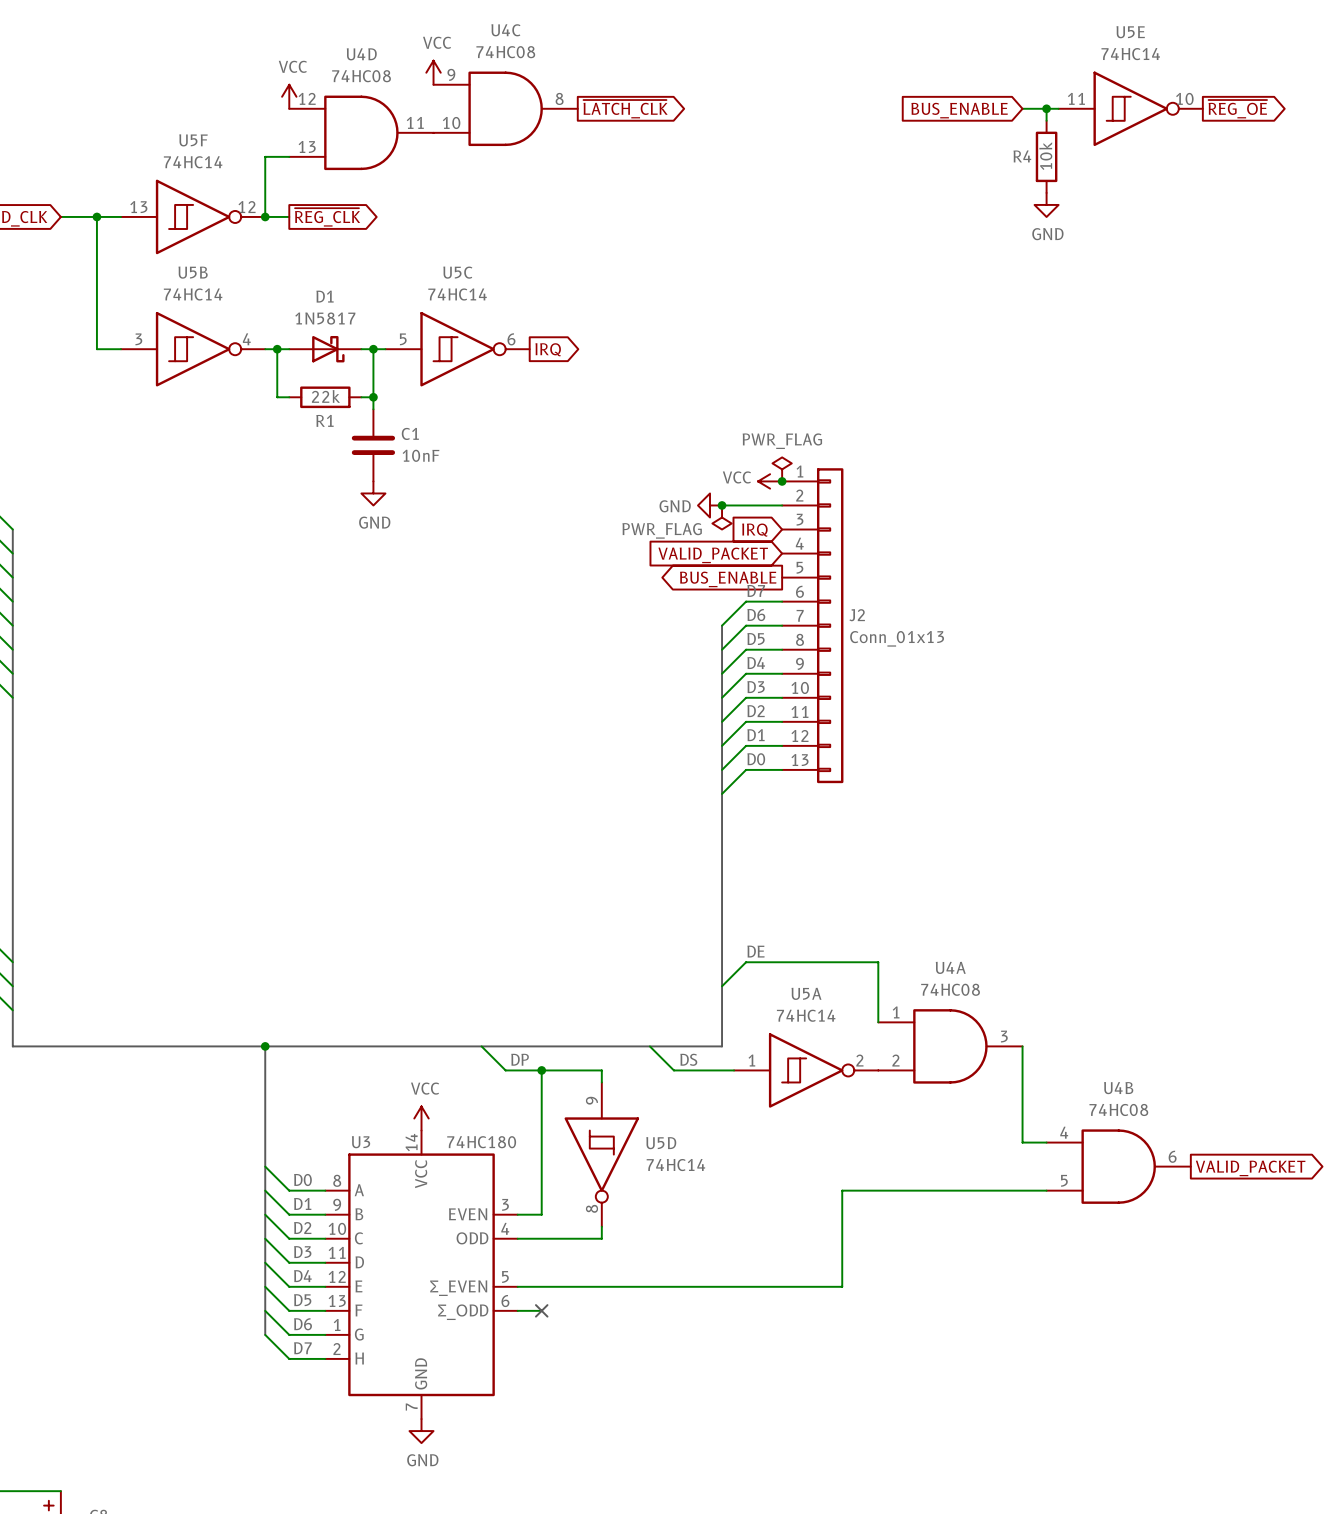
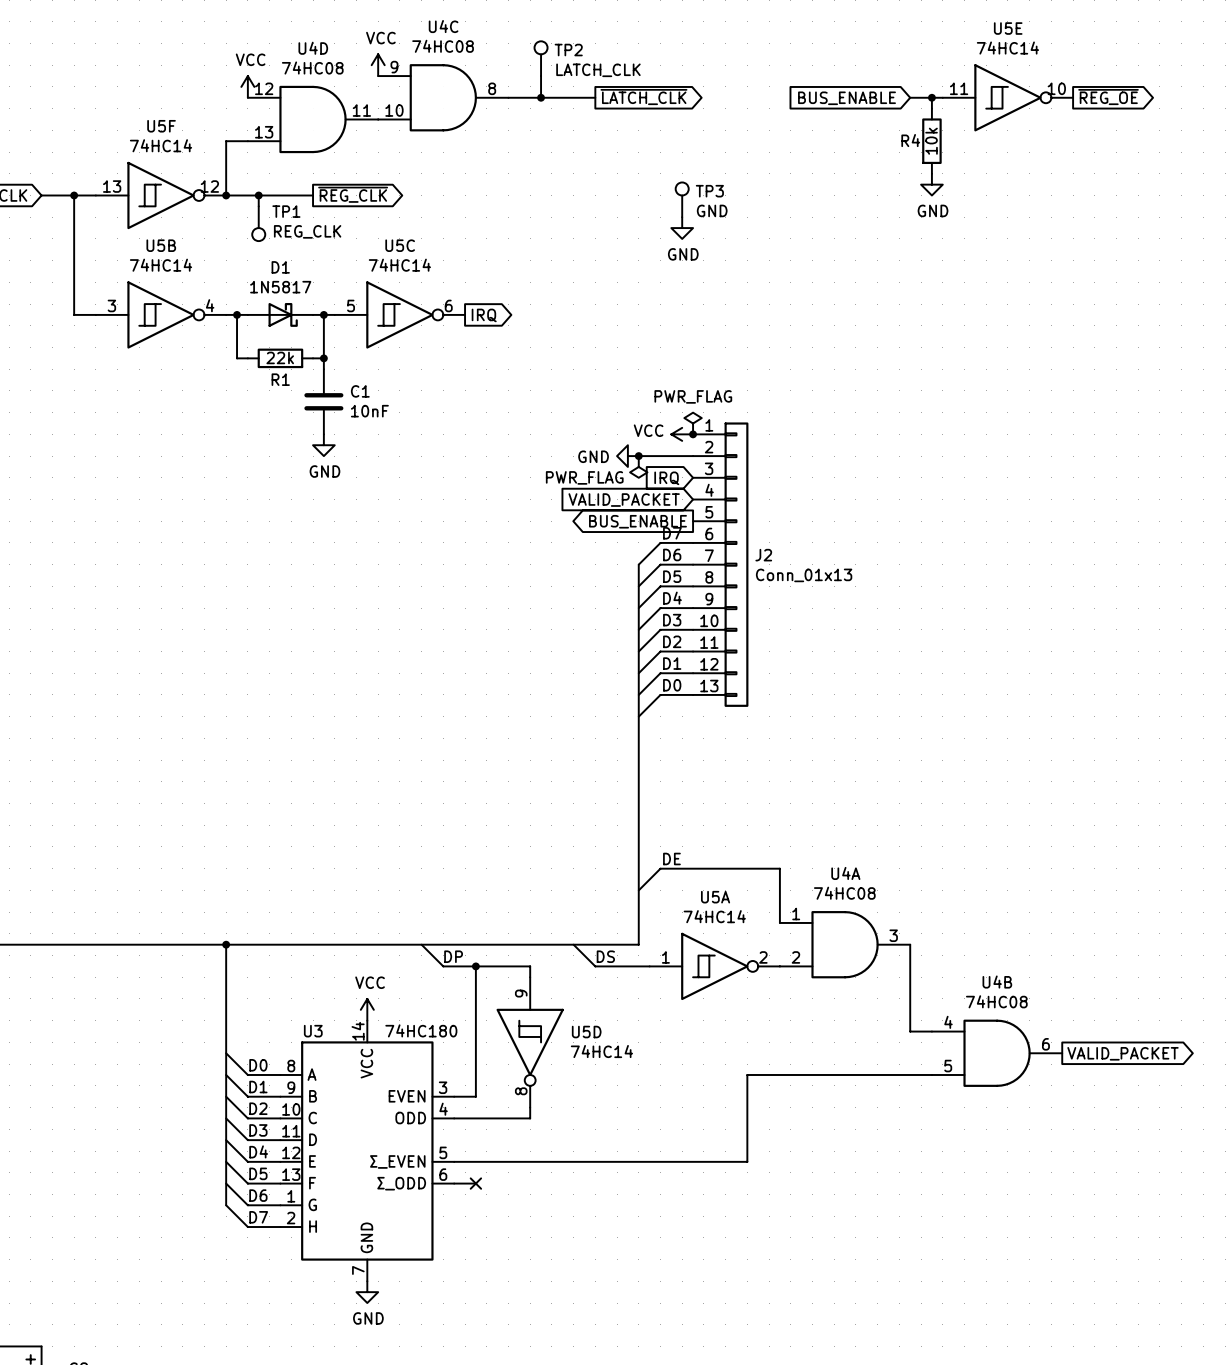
TP2: none -> LATCH_CLK (541, 58)
wire: none -> (541, 76) (541, 97)
wire: none -> (508, 97) (595, 97)
junction: none -> (541, 97)
global label position: ~{LATCH_CLK} (625, 109) -> ~{LATCH_CLK} (643, 97)
wire: none -> (247, 195) (313, 195)
wire: none -> (258, 195) (258, 206)
junction: none -> (258, 195)
global label position: ~{REG_CLK} (327, 217) -> ~{REG_CLK} (353, 194)
TP3: none -> GND (682, 199)
TP1: none -> REG_CLK (258, 223)
power symbol: none -> GND (682, 228)

